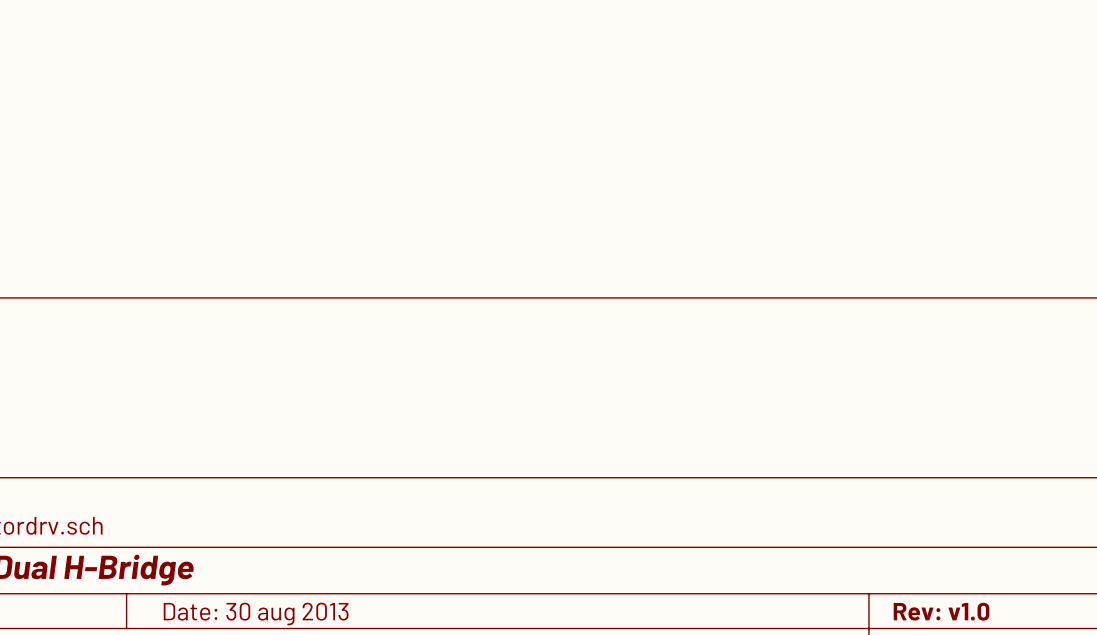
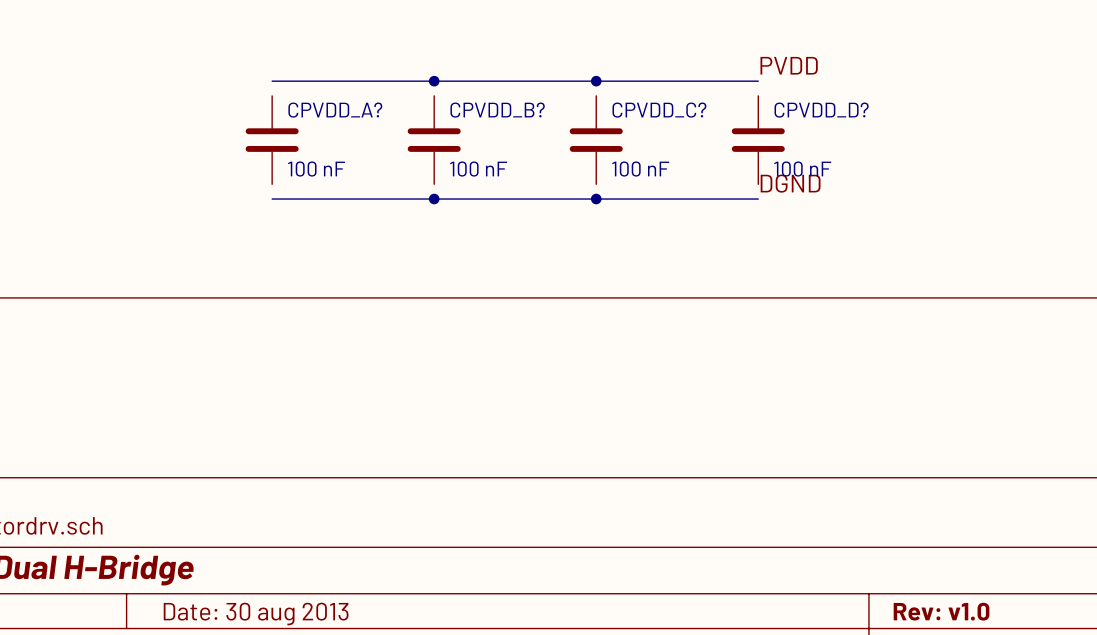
label: none -> PVDD (789, 65)
wire: none -> (272, 81) (758, 81)
junction: none -> (434, 81)
junction: none -> (596, 81)
CPVDD_A?: none -> 100 nF (272, 140)
CPVDD_B?: none -> 100 nF (434, 140)
CPVDD_C?: none -> 100 nF (596, 140)
CPVDD_D?: none -> 100 nF (758, 140)
label: none -> DGND (790, 183)
wire: none -> (272, 199) (758, 199)
junction: none -> (434, 199)
junction: none -> (596, 199)

